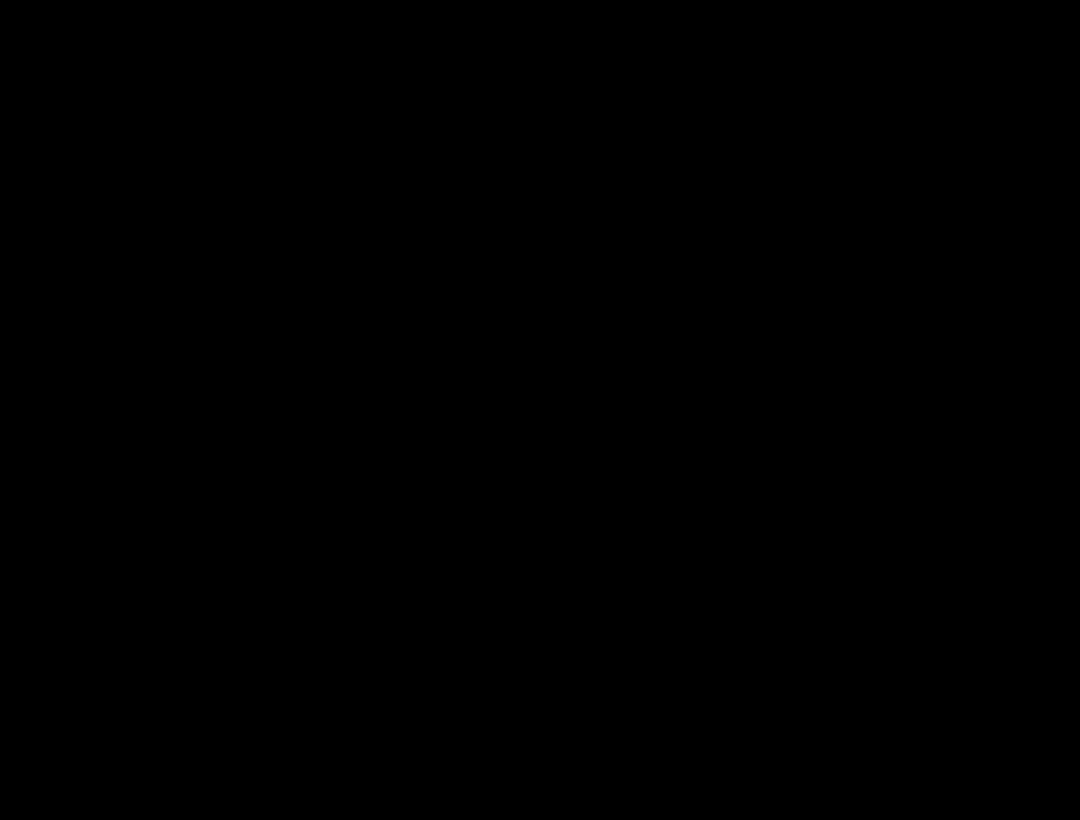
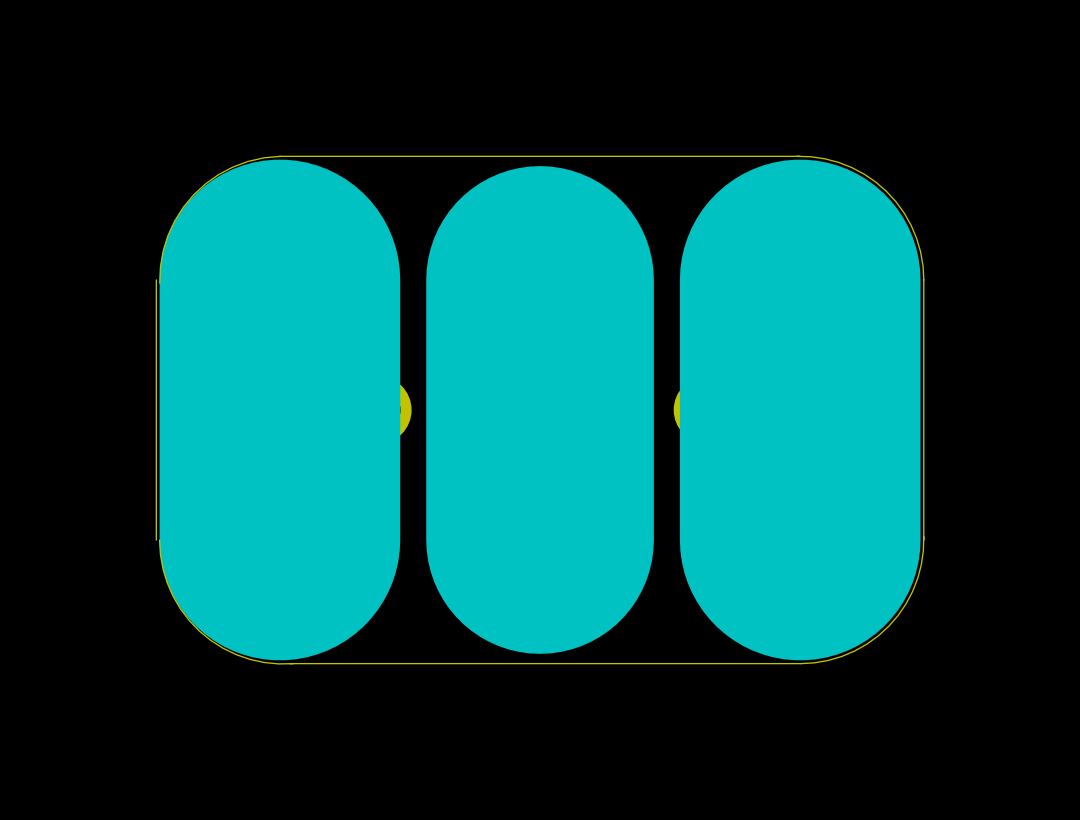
part: none -> (540, 410)

